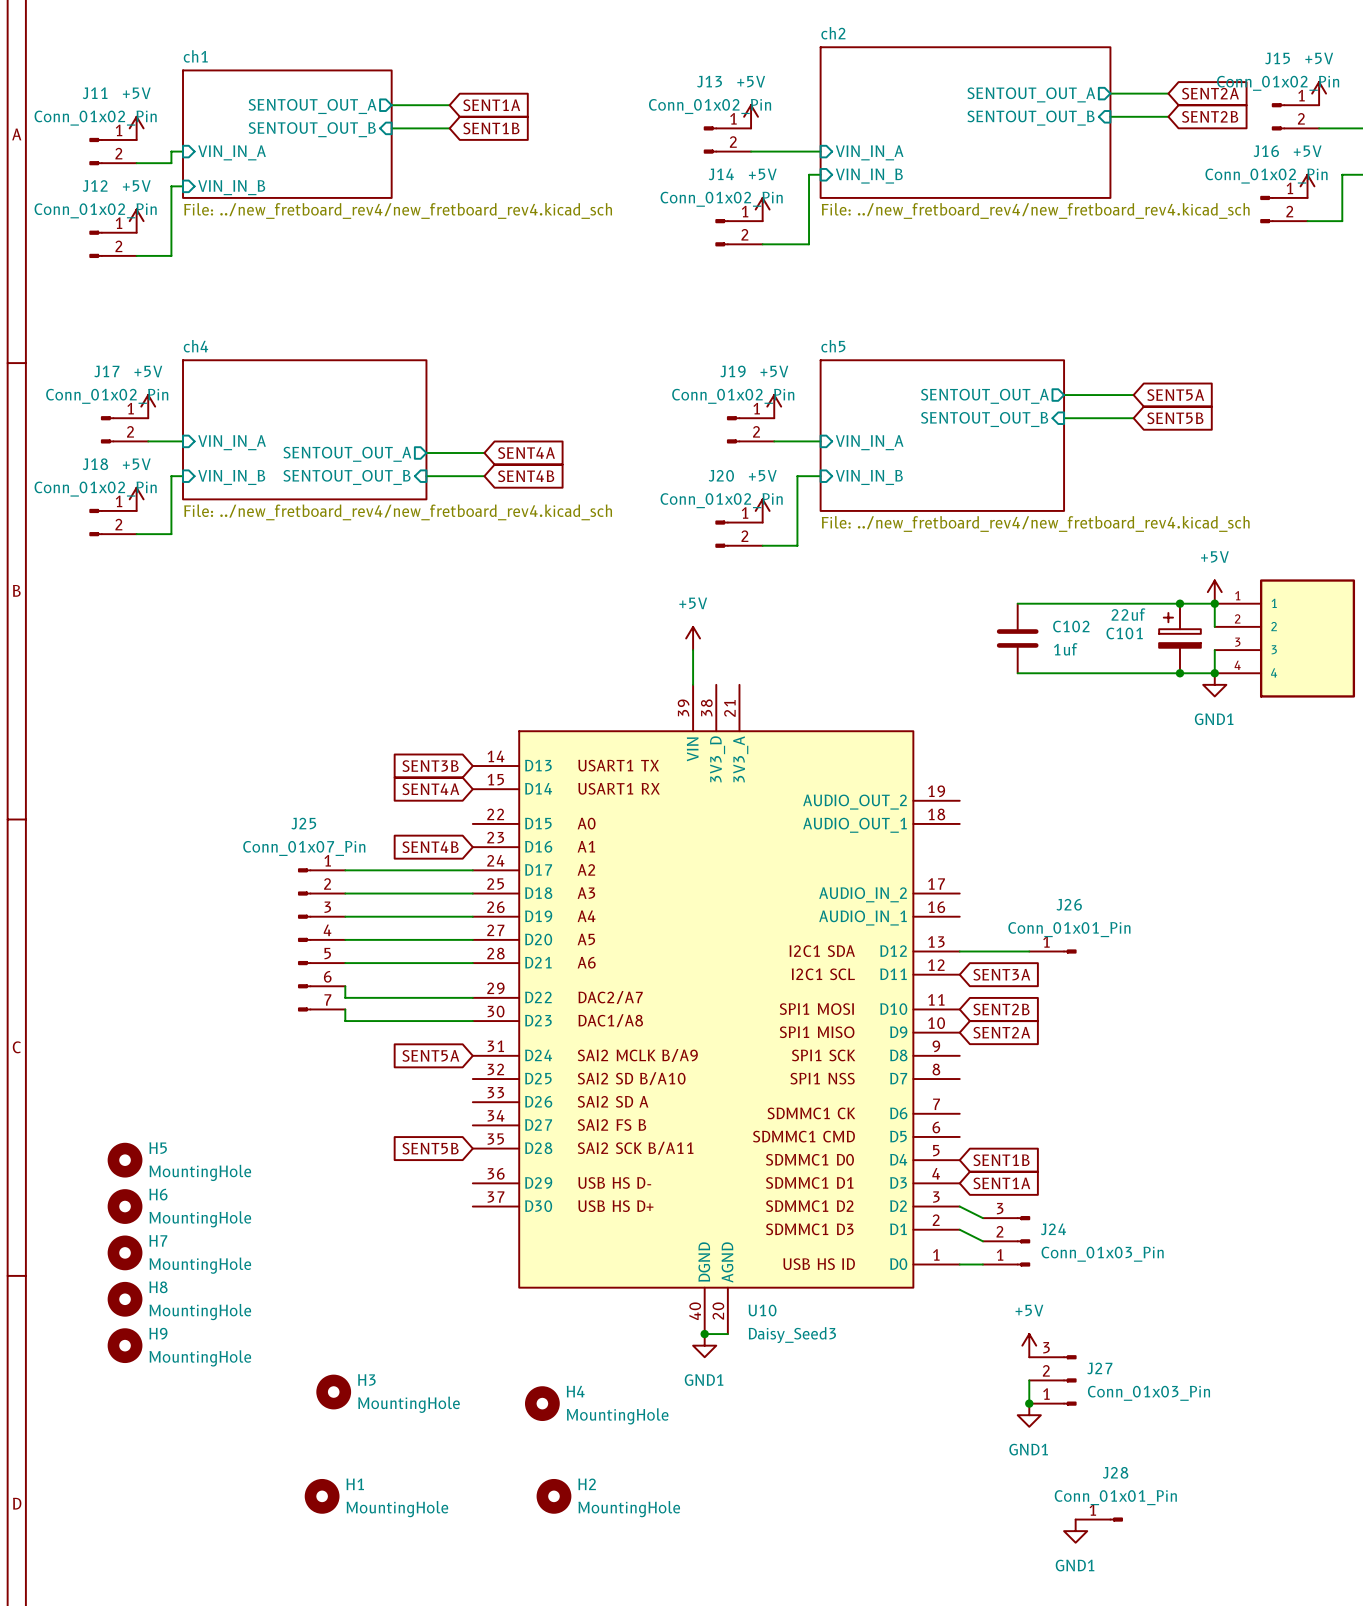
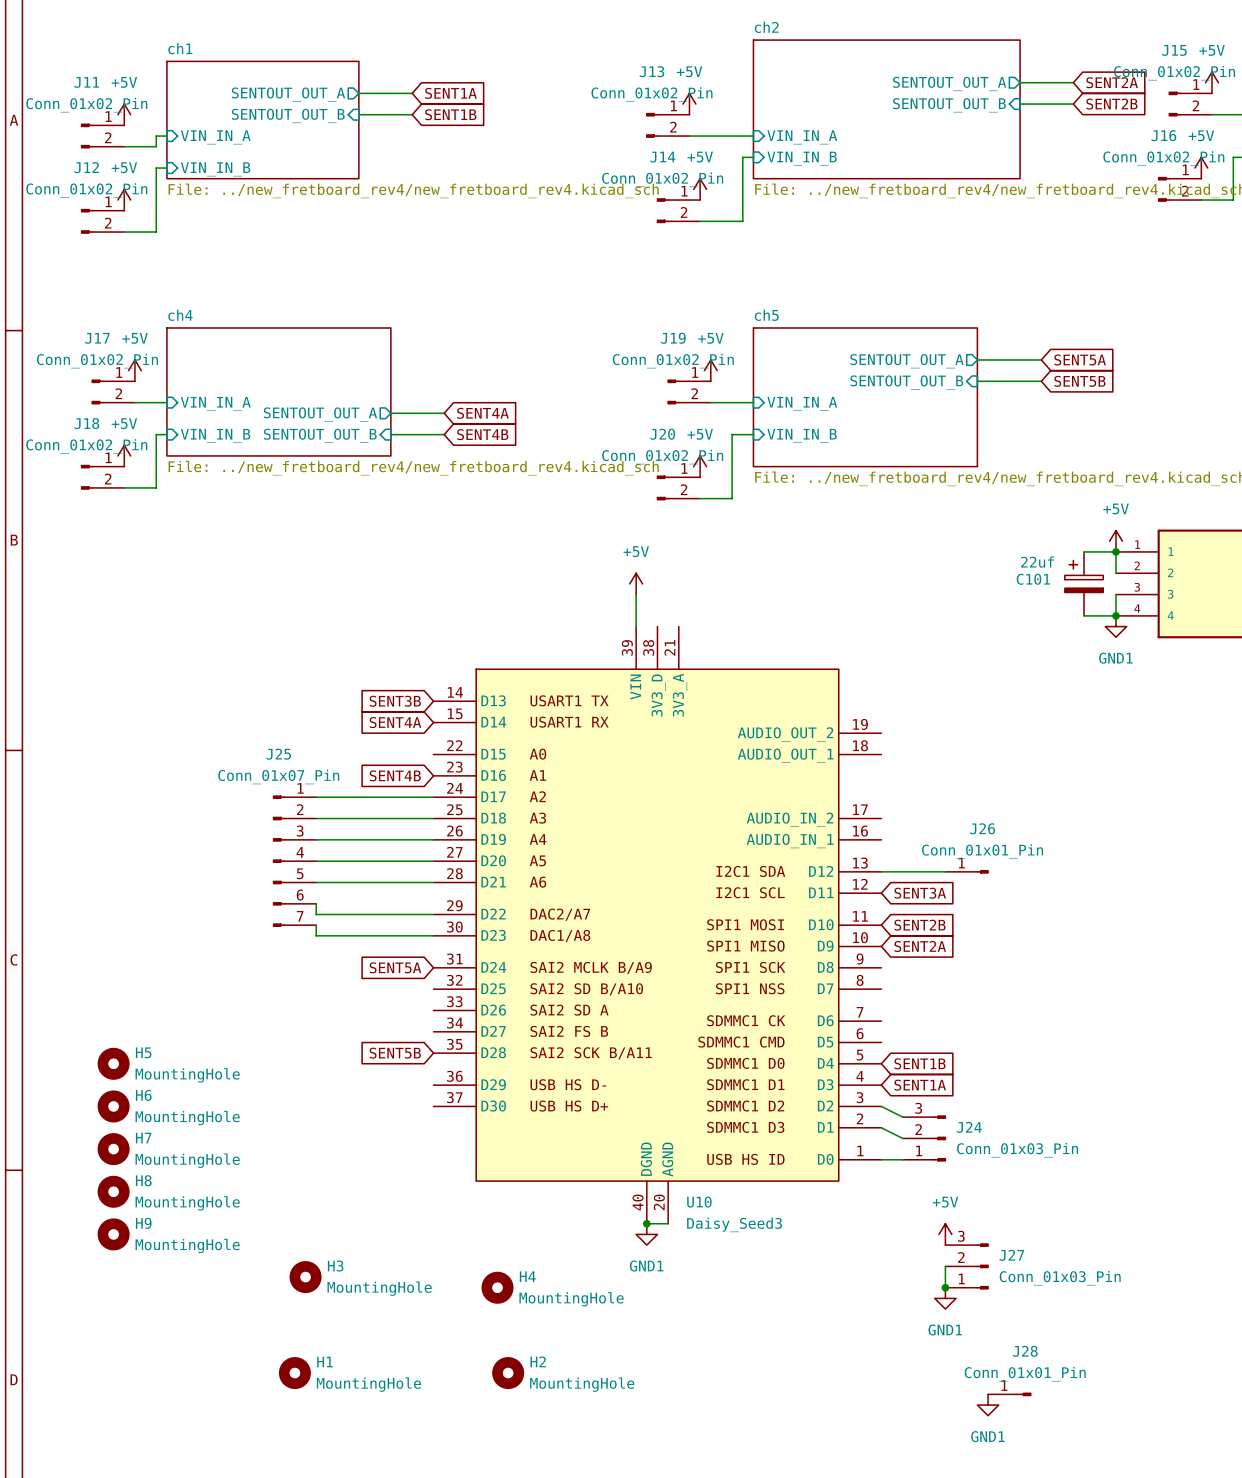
wire: (1017, 603) (1179, 603) -> none
junction: (1179, 603) -> none
C102: 1uf (1017, 638) -> none
wire: (1017, 673) (1179, 673) -> none
junction: (1179, 673) -> none

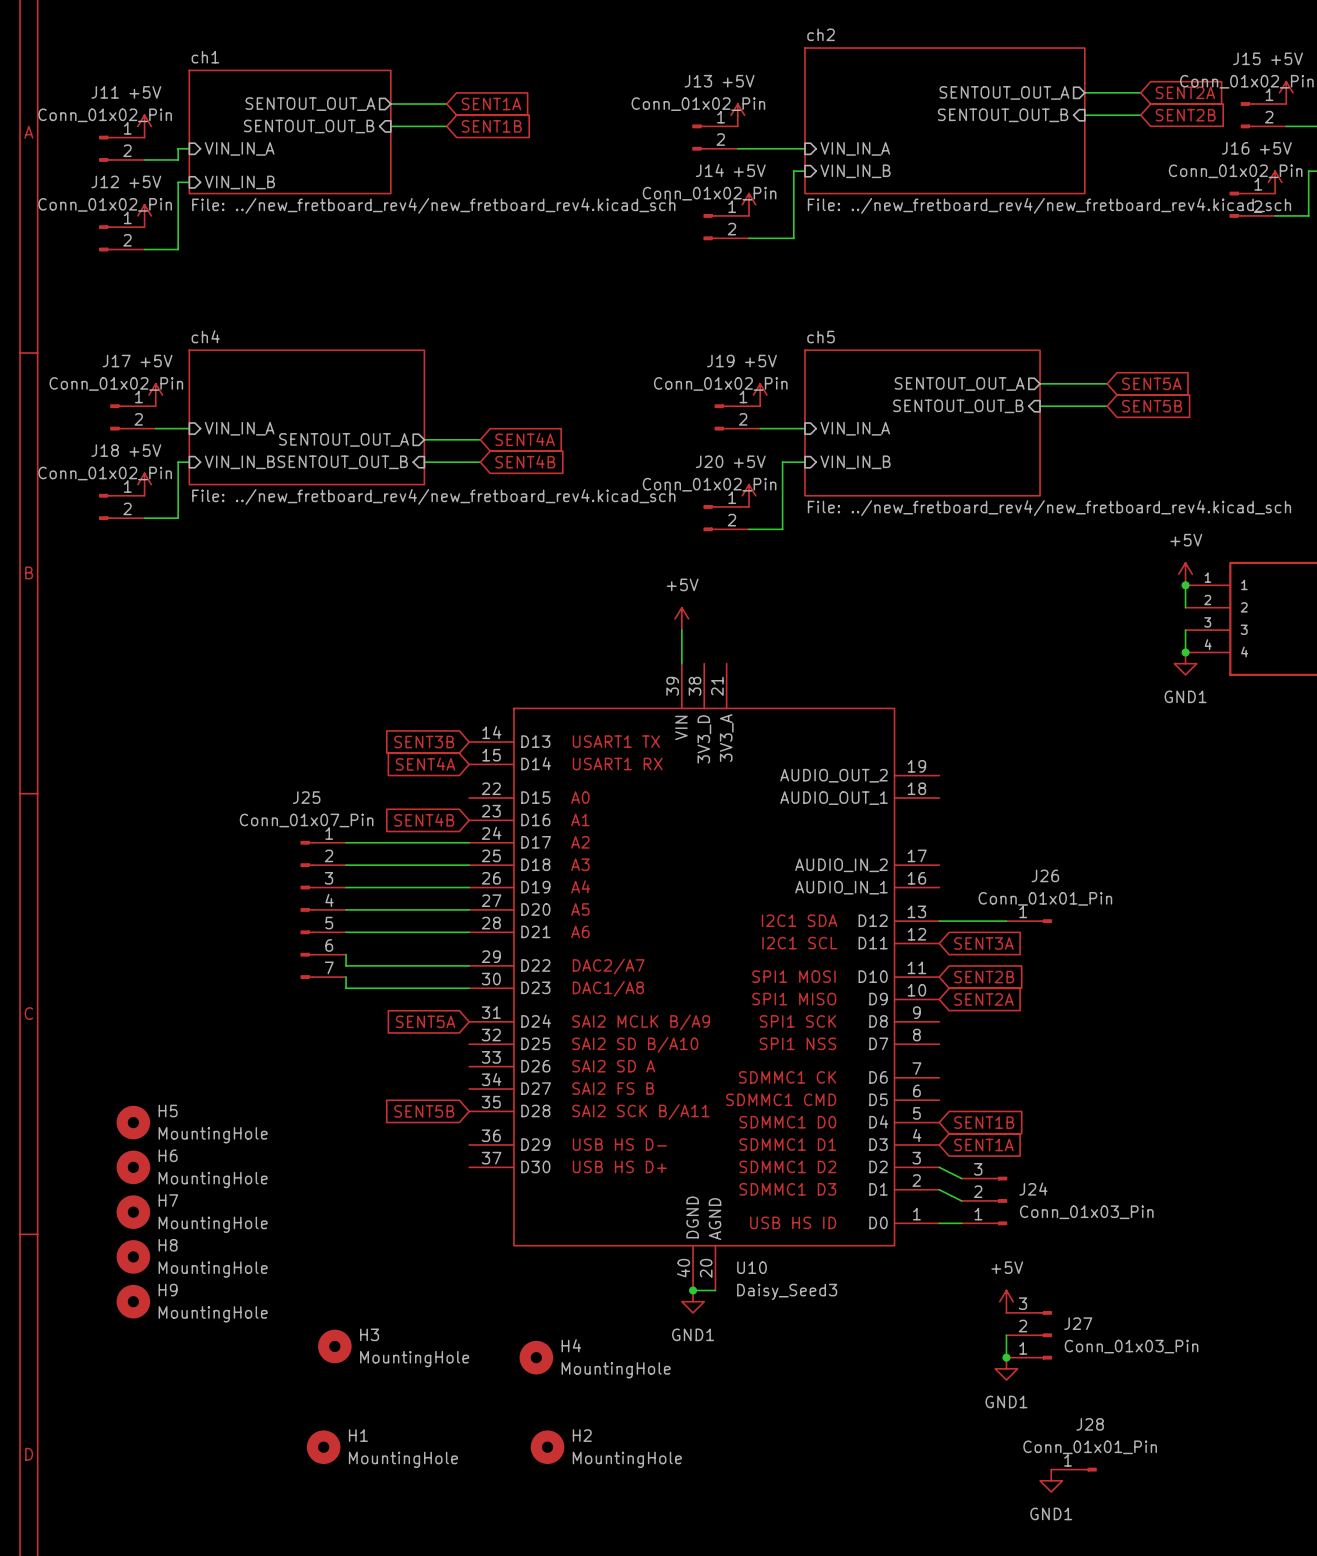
wire: (1084, 551) (1116, 551) -> none
C101: 22uf (1084, 583) -> none
wire: (1084, 615) (1116, 615) -> none

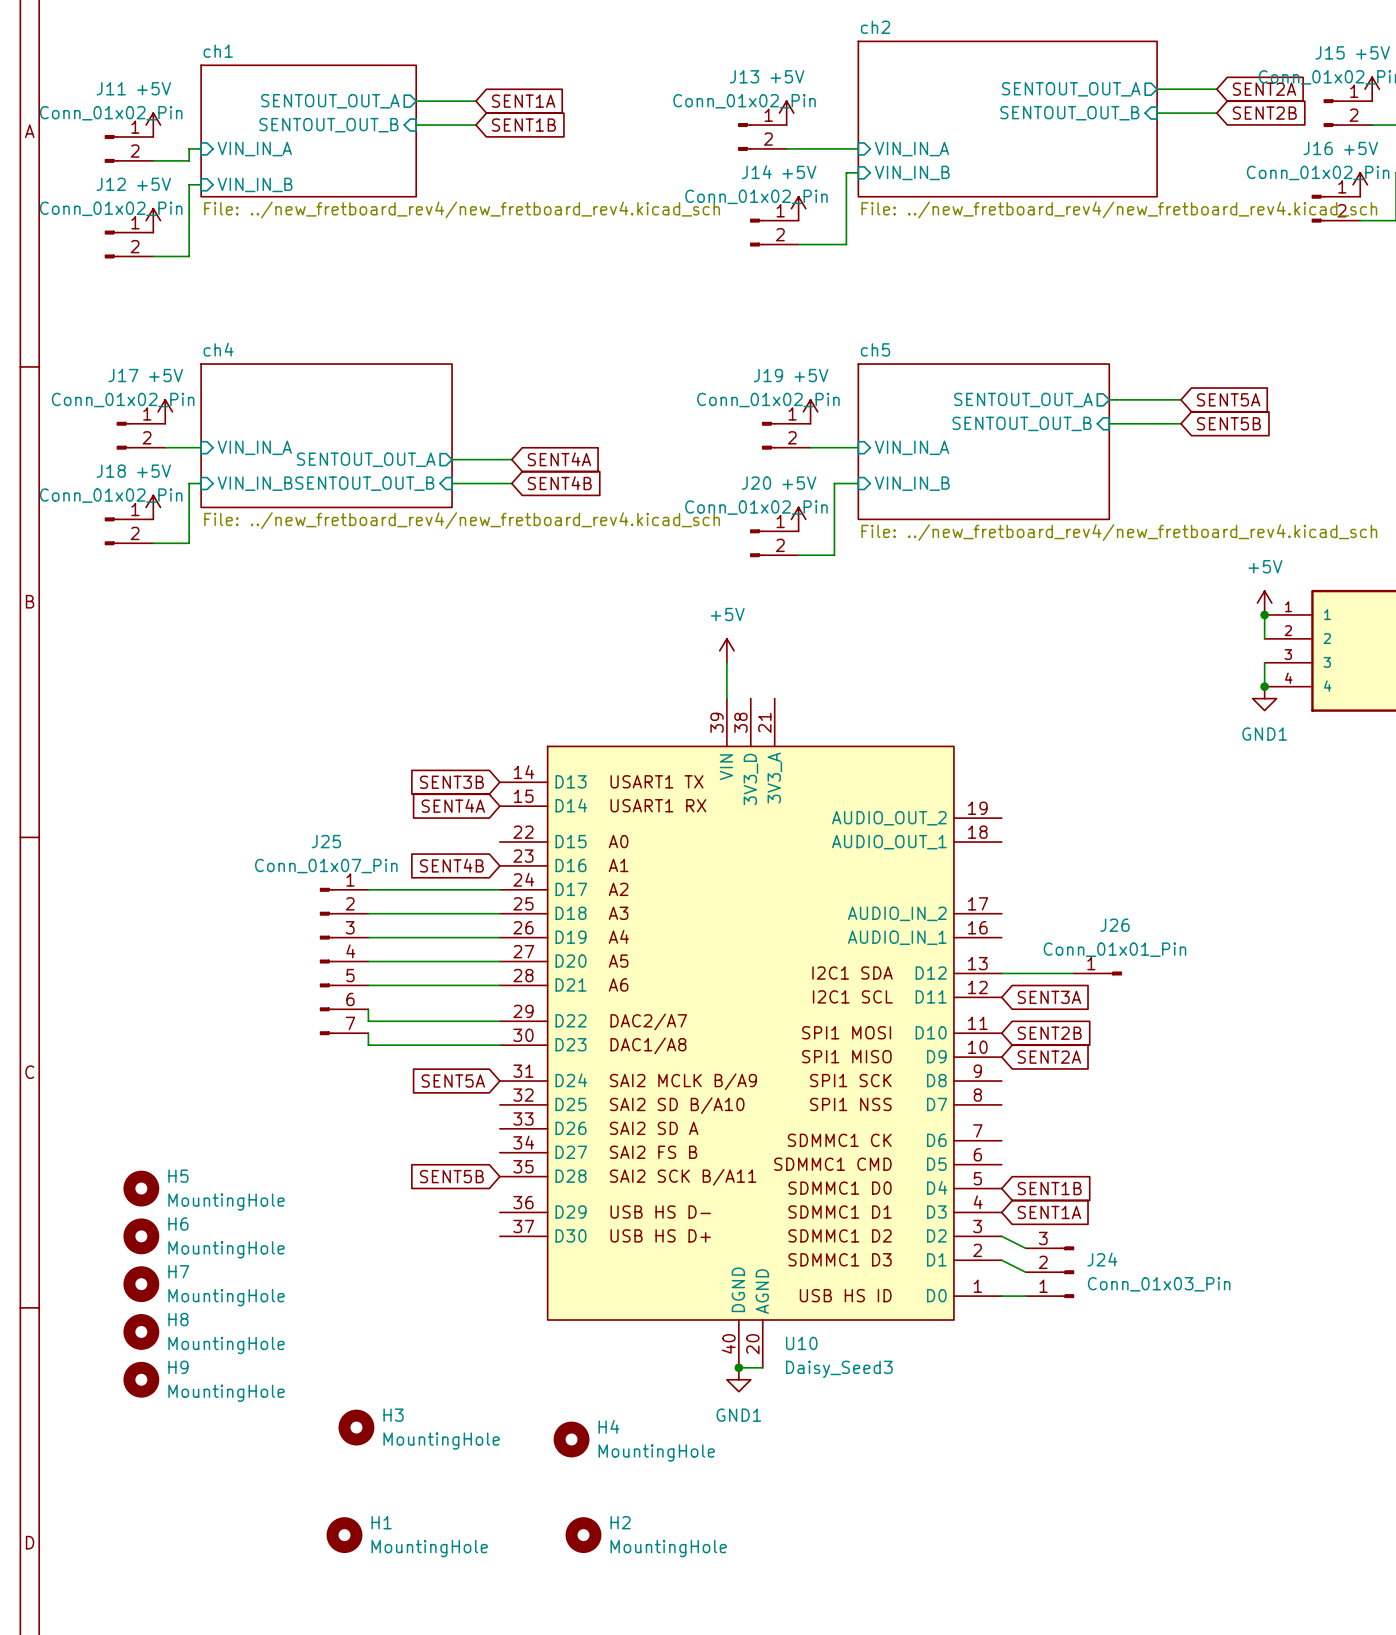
power symbol: +5V (1006, 1301) -> none
wire: (1006, 1335) (1006, 1357) -> none
J27: Conn_01x03_Pin (1029, 1335) -> none
junction: (1006, 1357) -> none
power symbol: GND1 (1006, 1368) -> none
J28: Conn_01x01_Pin (1073, 1469) -> none
power symbol: GND1 (1051, 1480) -> none

